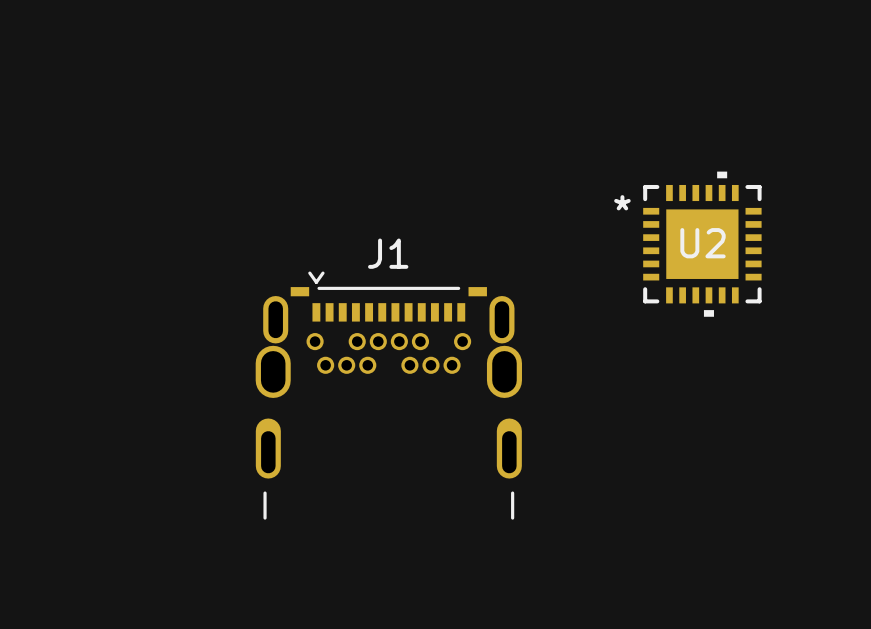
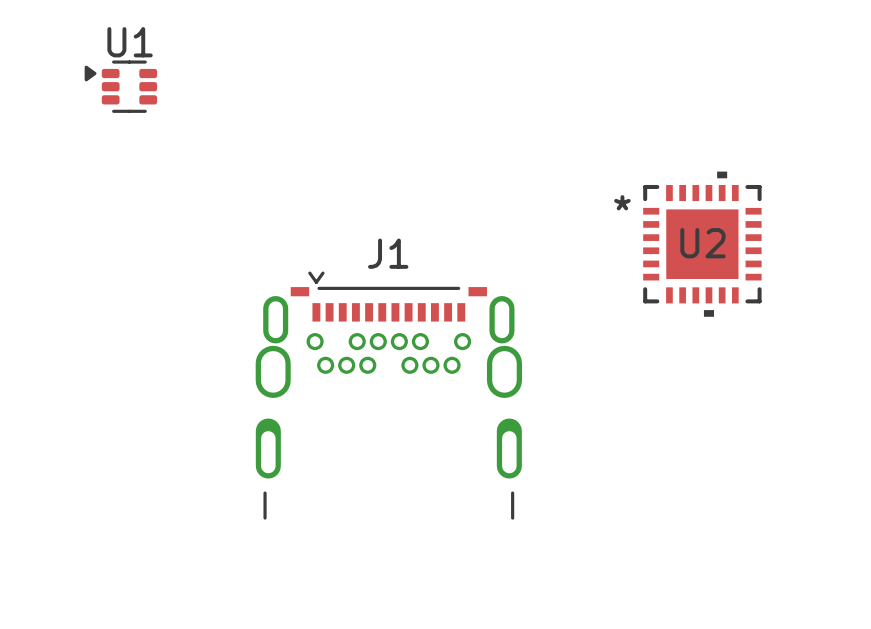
U1: none -> (120, 86)

